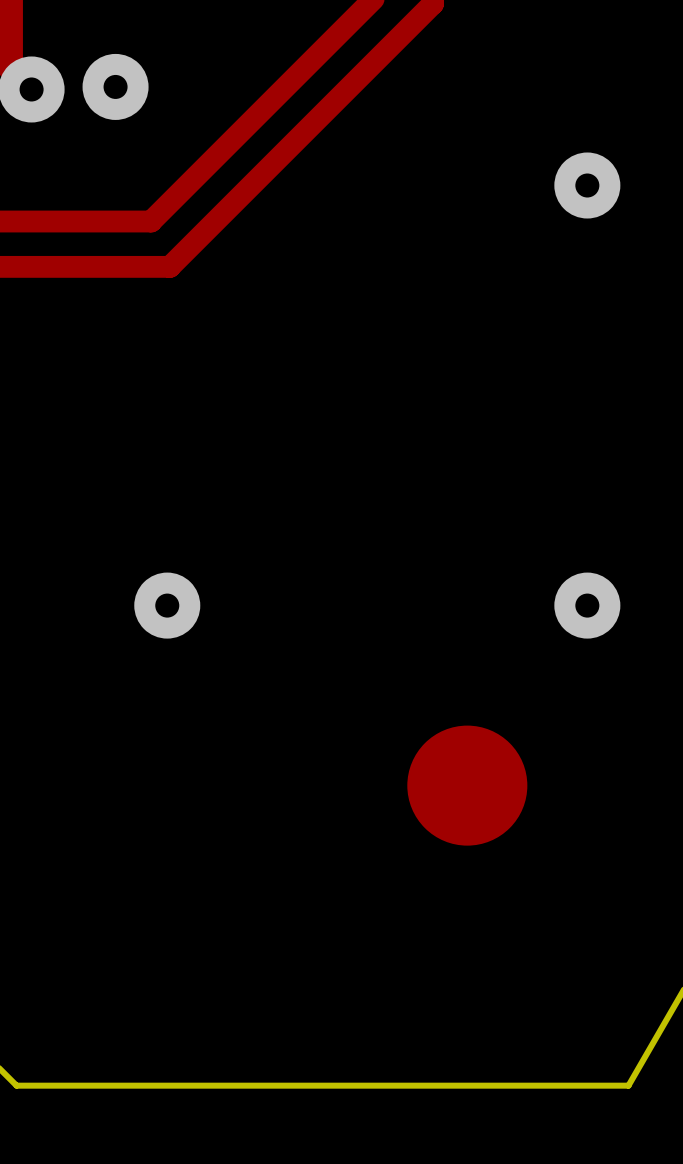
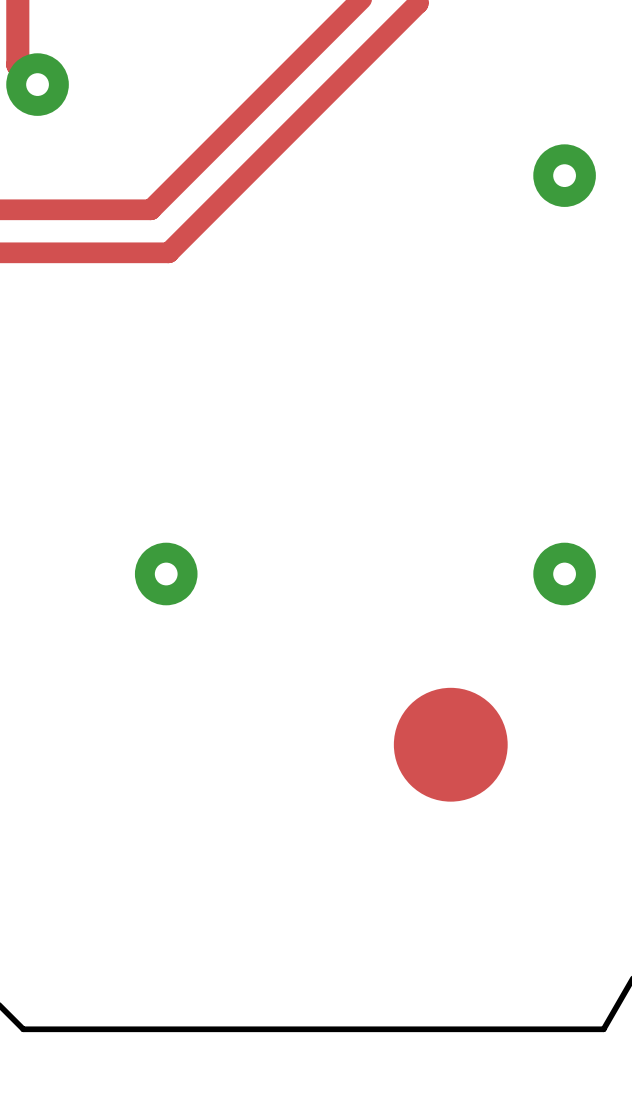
via: (115, 86) -> none

